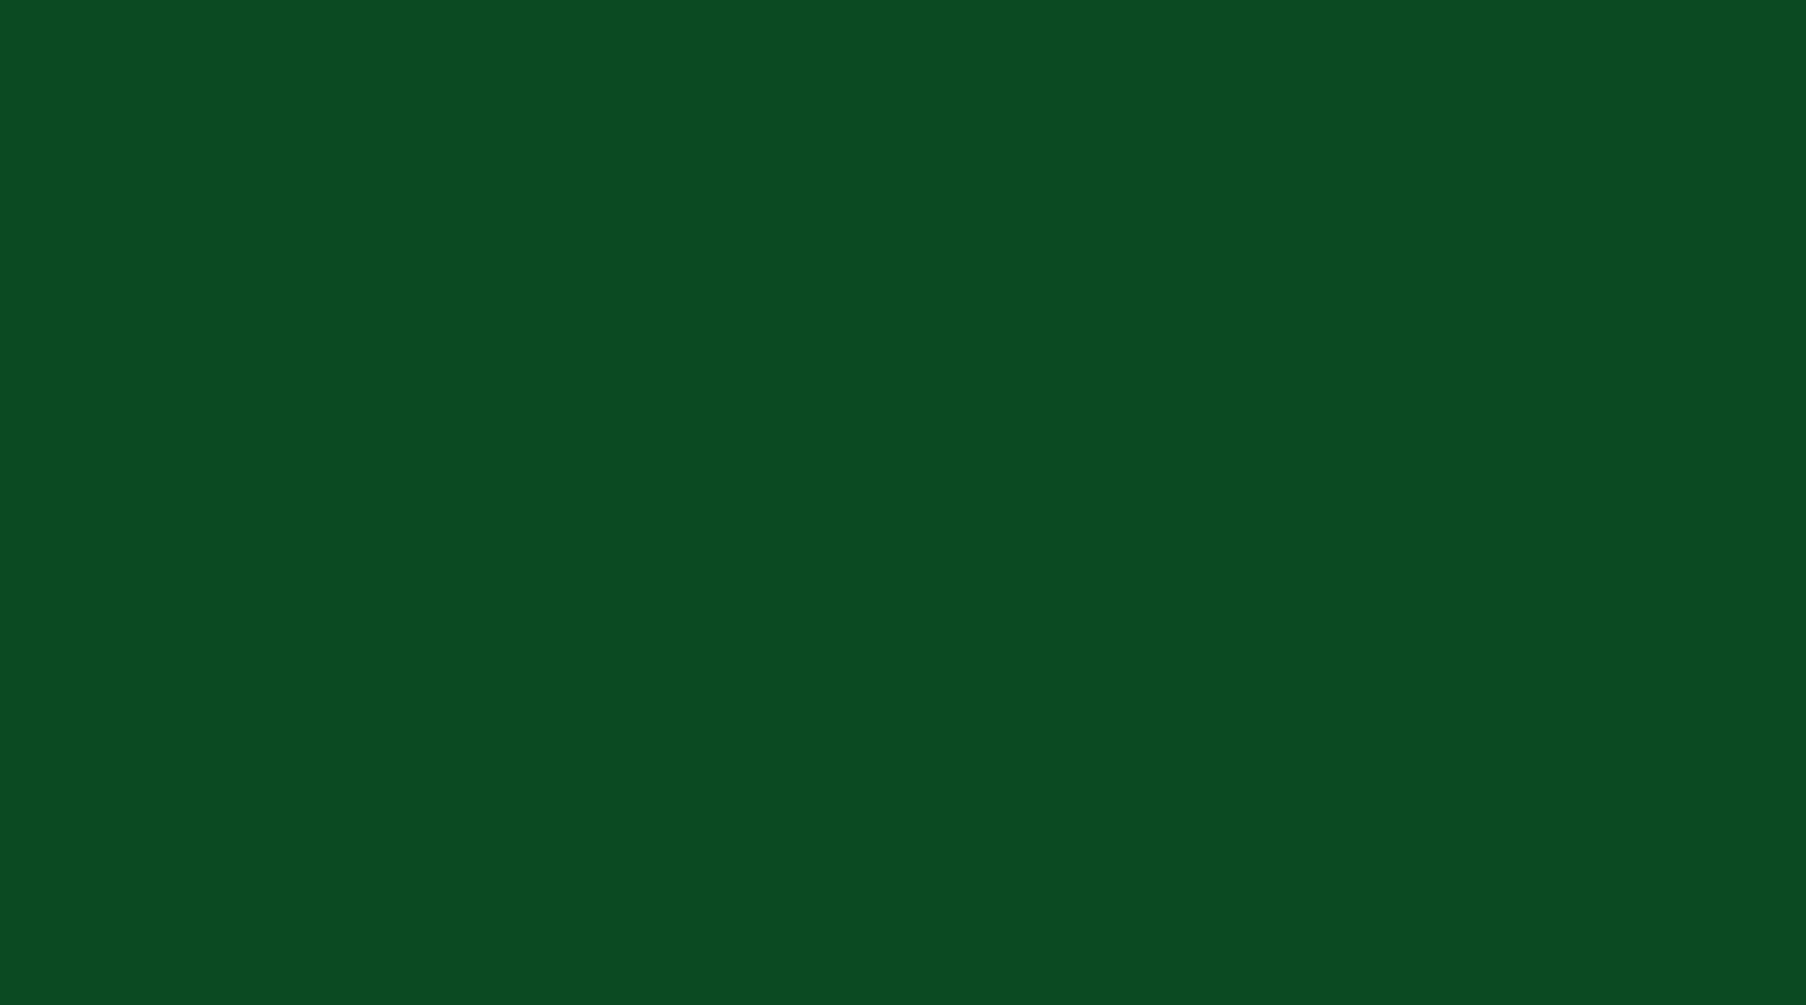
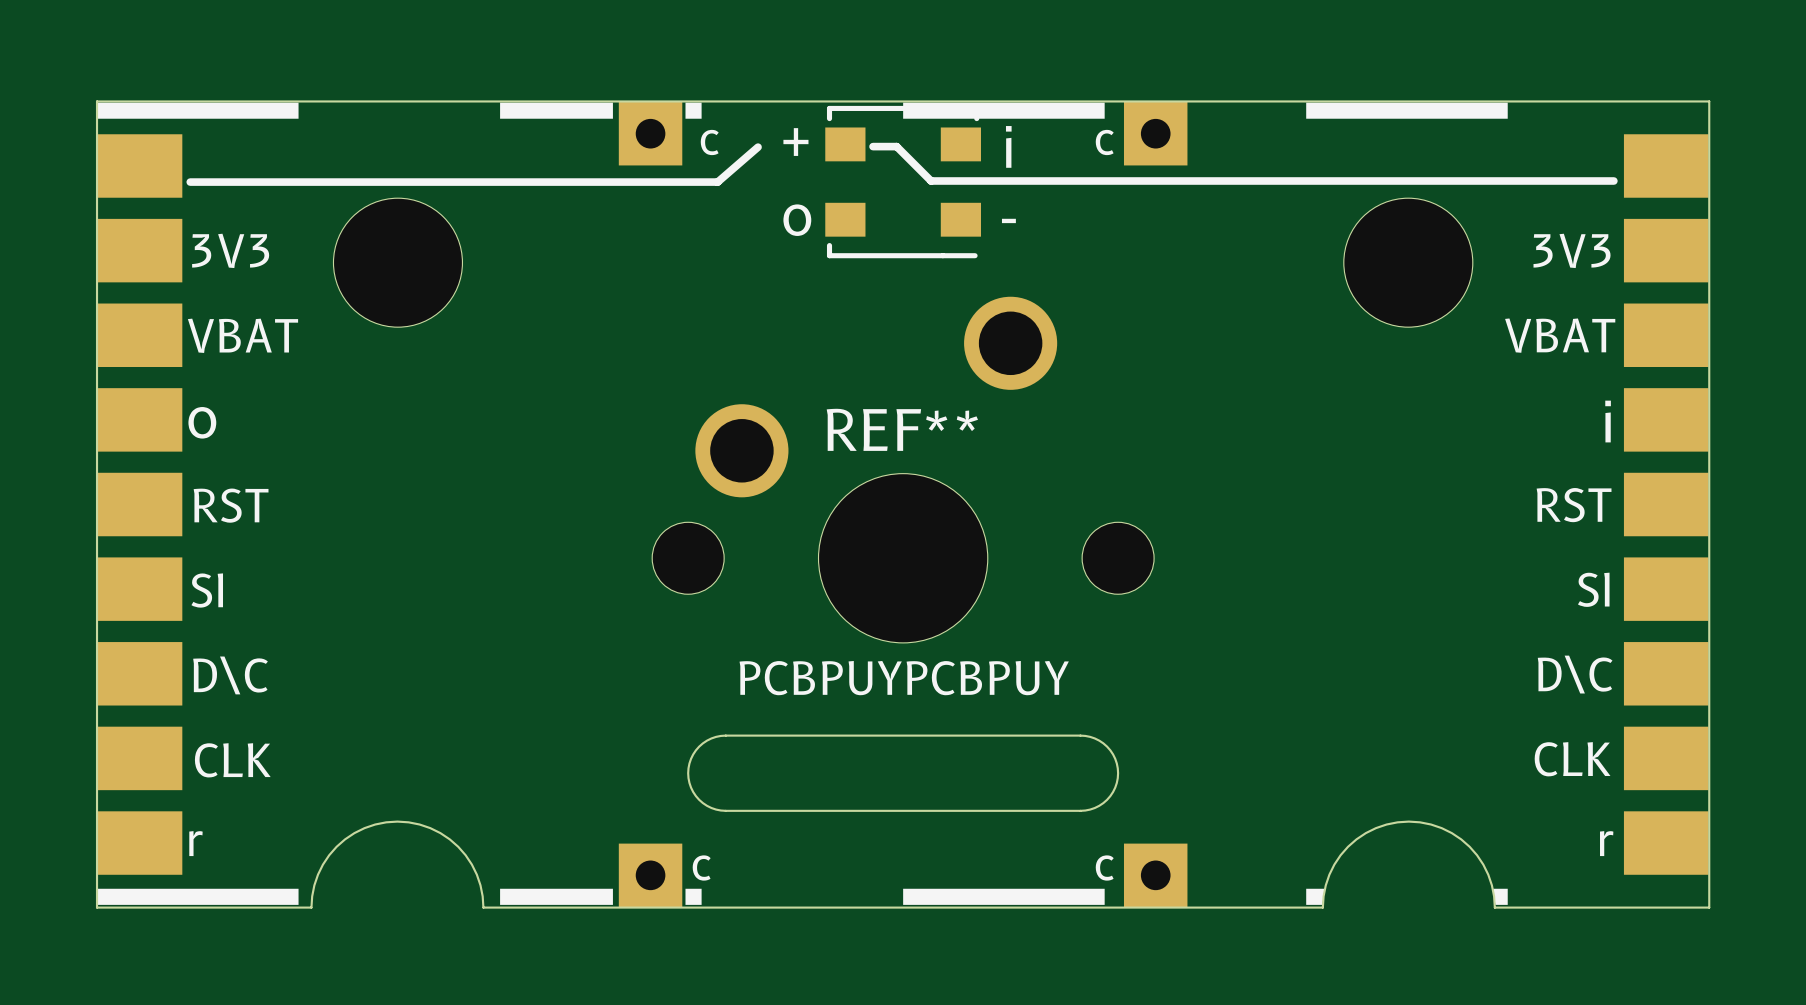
board edge: none -> (97, 101) (1709, 101) (1709, 907) (1494, 907) (1488, 874) (1469, 846) (1441, 828) (1408, 821) (1375, 828) (1348, 846) (1329, 874) (1322, 907) (483, 907) (476, 874) (458, 846) (430, 828) (397, 821) (364, 828) (336, 846) (317, 874) (311, 907) (97, 907) (97, 101)
drawing: none -> [97, 102, 299, 119]
drawing: none -> [500, 102, 613, 119]
drawing: none -> [685, 102, 702, 119]
drawing: none -> [903, 102, 1105, 119]
drawing: none -> [1306, 102, 1508, 119]
part: none -> (650, 133)
part: none -> (1155, 133)
text: none -> c (709, 142)
text: none -> c (1104, 142)
line: none -> (873, 146) (896, 146) (931, 181) (1613, 181)
line: none -> (758, 147) (717, 182) (190, 182)
part: none -> (903, 182)
text: none -> 3V3 (230, 250)
text: none -> 3V3 (1572, 250)
REF**: none -> (903, 262)
text: none -> VBAT (242, 335)
text: none -> VBAT (1560, 335)
text: none -> i (1608, 421)
text: none -> o (202, 422)
part: none -> (903, 469)
part: none -> (140, 504)
part: none -> (1666, 504)
text: none -> RST (231, 505)
text: none -> RST (1574, 505)
text: none -> SI (1593, 589)
text: none -> SI (207, 590)
text: none -> D\C (1575, 674)
text: none -> D\C (230, 675)
text: none -> PCBPUYPCBPUY (904, 678)
board edge: none -> (725, 735) (1085, 735) (1099, 740) (1110, 750) (1116, 763) (1117, 778) (1113, 792) (1107, 799) (1099, 805) (1085, 810) (720, 810) (706, 805) (695, 796) (689, 782) (688, 768) (693, 754) (702, 743) (711, 738) (725, 735)
text: none -> CLK (1572, 759)
text: none -> CLK (232, 760)
text: none -> r (195, 843)
text: none -> r (1606, 843)
text: none -> c (701, 868)
text: none -> c (1104, 868)
part: none -> (650, 875)
part: none -> (1155, 875)
drawing: none -> [97, 888, 299, 905]
drawing: none -> [500, 888, 613, 905]
drawing: none -> [685, 888, 702, 905]
drawing: none -> [903, 888, 1105, 905]
drawing: none -> [1306, 888, 1325, 905]
drawing: none -> [1493, 888, 1508, 905]

